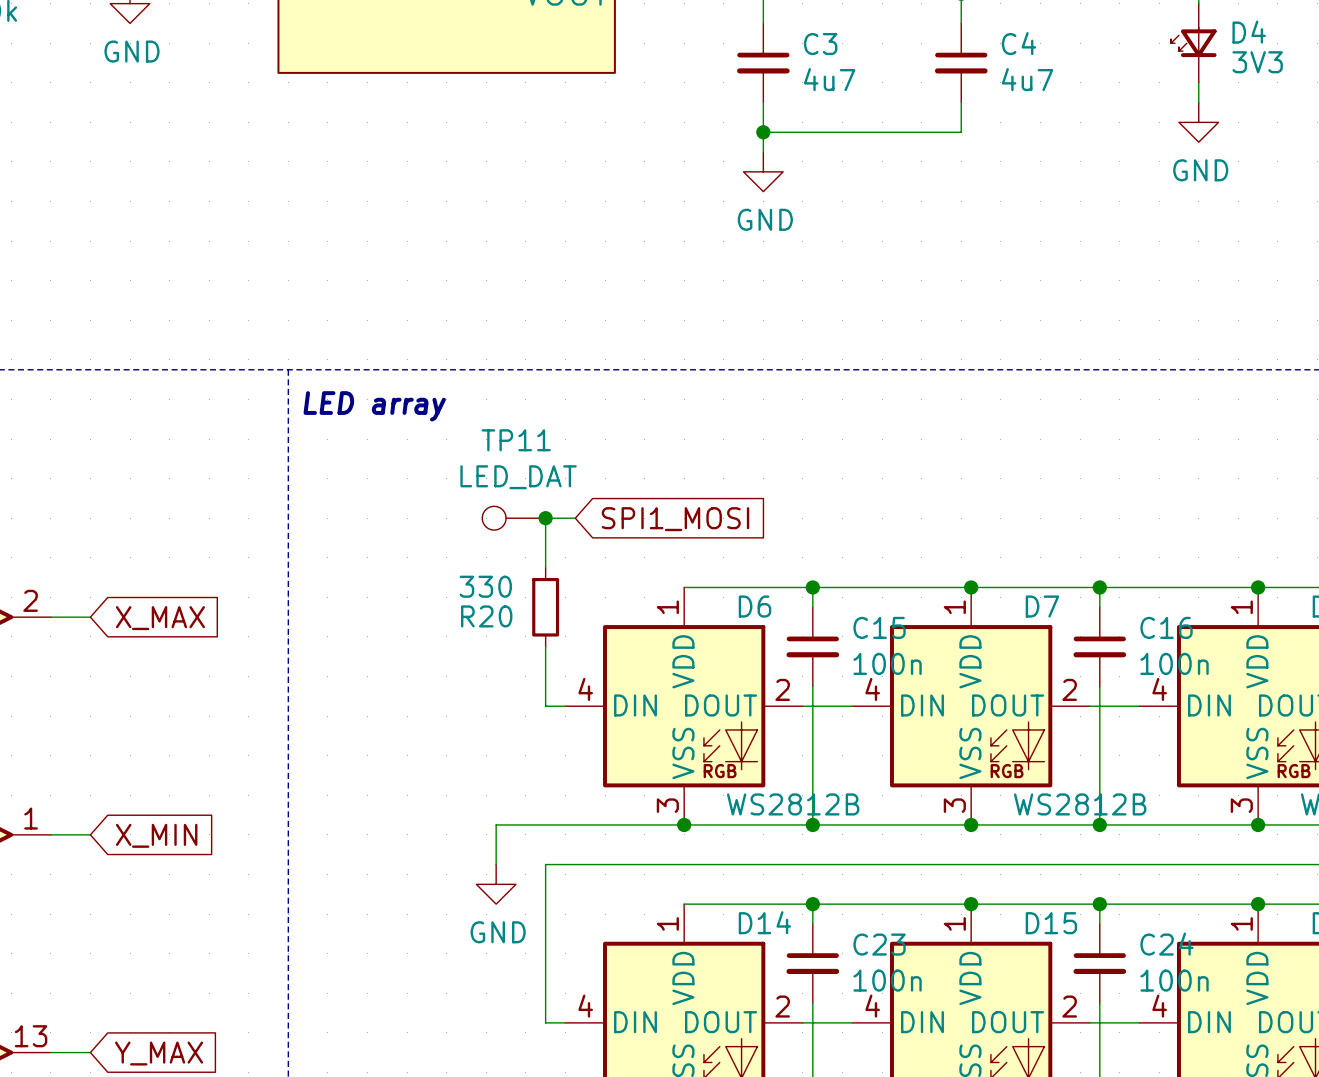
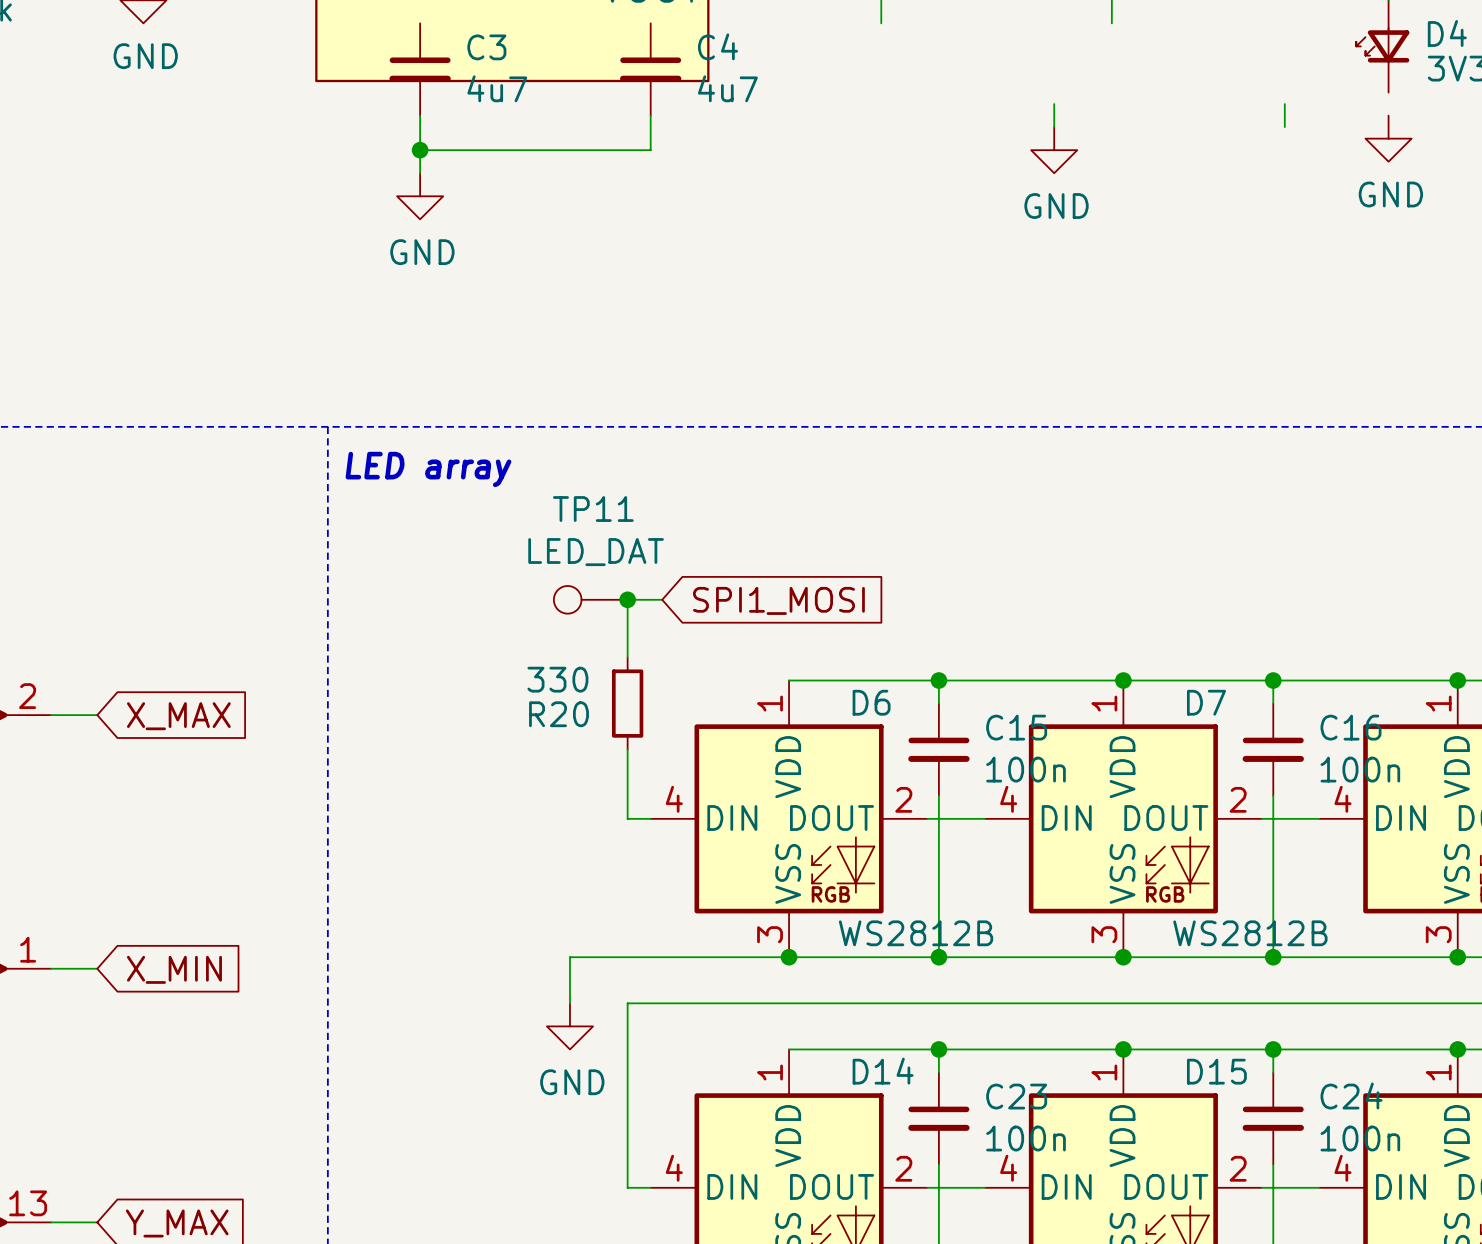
C3 position: (763, 63) -> (420, 69)
C4 position: (961, 63) -> (650, 69)
wire: (1198, 82) (1198, 102) -> (1284, 104) (1284, 127)
wire: none -> (1054, 104) (1054, 127)
wire: none -> (420, 115) (420, 173)
wire: none -> (650, 115) (650, 150) (420, 150)
wire: (763, 102) (763, 152) -> none
wire: (961, 102) (961, 132) (763, 132) -> none
junction: none -> (420, 150)
junction: (763, 132) -> none
power symbol: none -> GND (420, 196)
power symbol position: GND (763, 171) -> GND (1054, 150)

